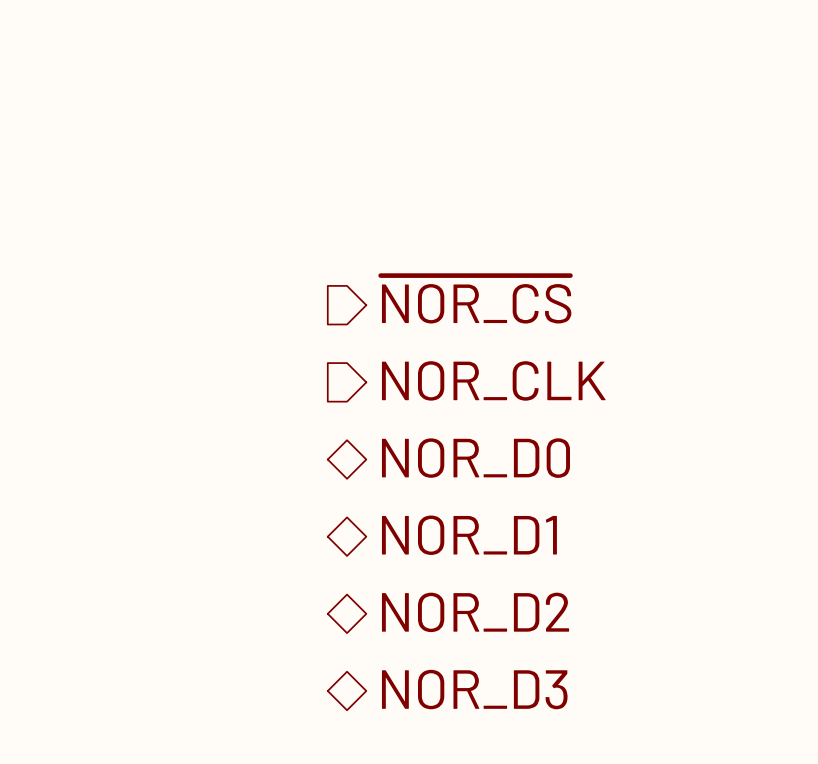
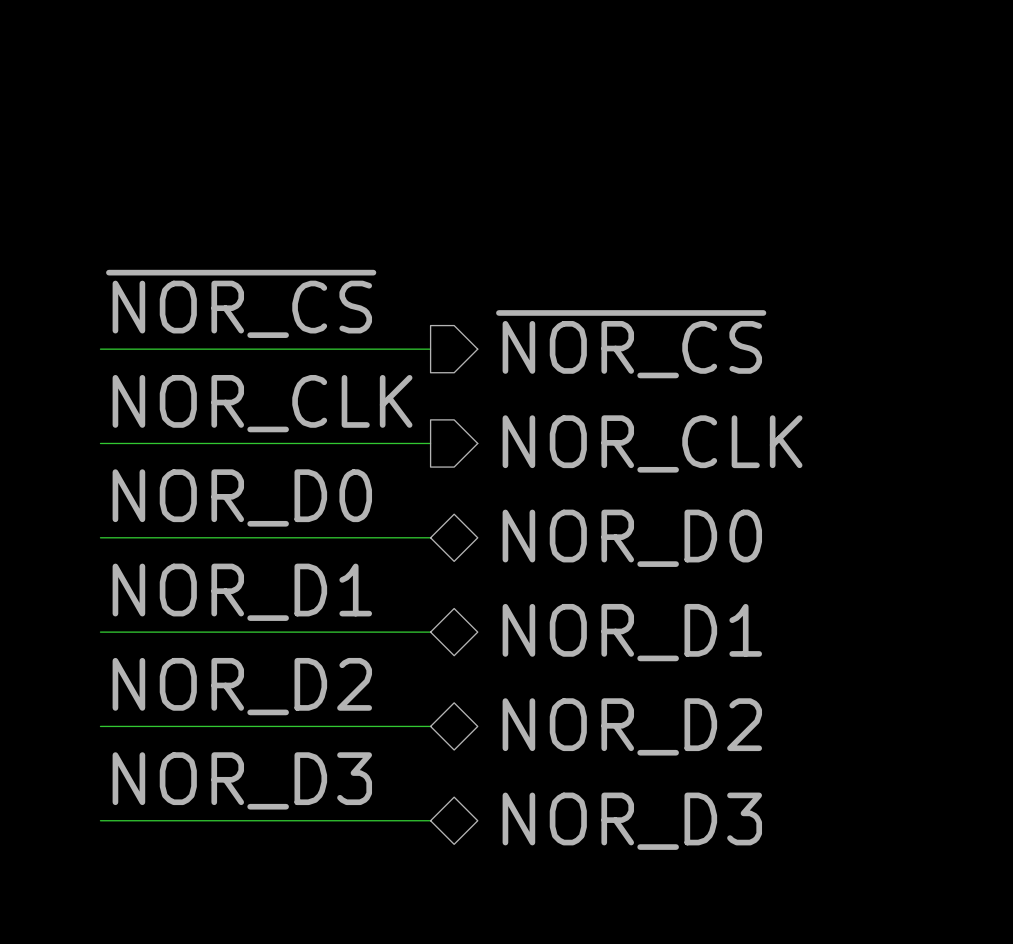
label: none -> ~{NOR_CS} (241, 303)
wire: none -> (100, 349) (430, 349)
label: none -> NOR_CLK (262, 403)
wire: none -> (100, 443) (430, 443)
label: none -> NOR_D0 (242, 497)
wire: none -> (100, 537) (430, 537)
label: none -> NOR_D1 (242, 592)
wire: none -> (100, 632) (430, 632)
label: none -> NOR_D2 (242, 686)
wire: none -> (100, 726) (430, 726)
label: none -> NOR_D3 (242, 780)
wire: none -> (100, 820) (430, 820)

